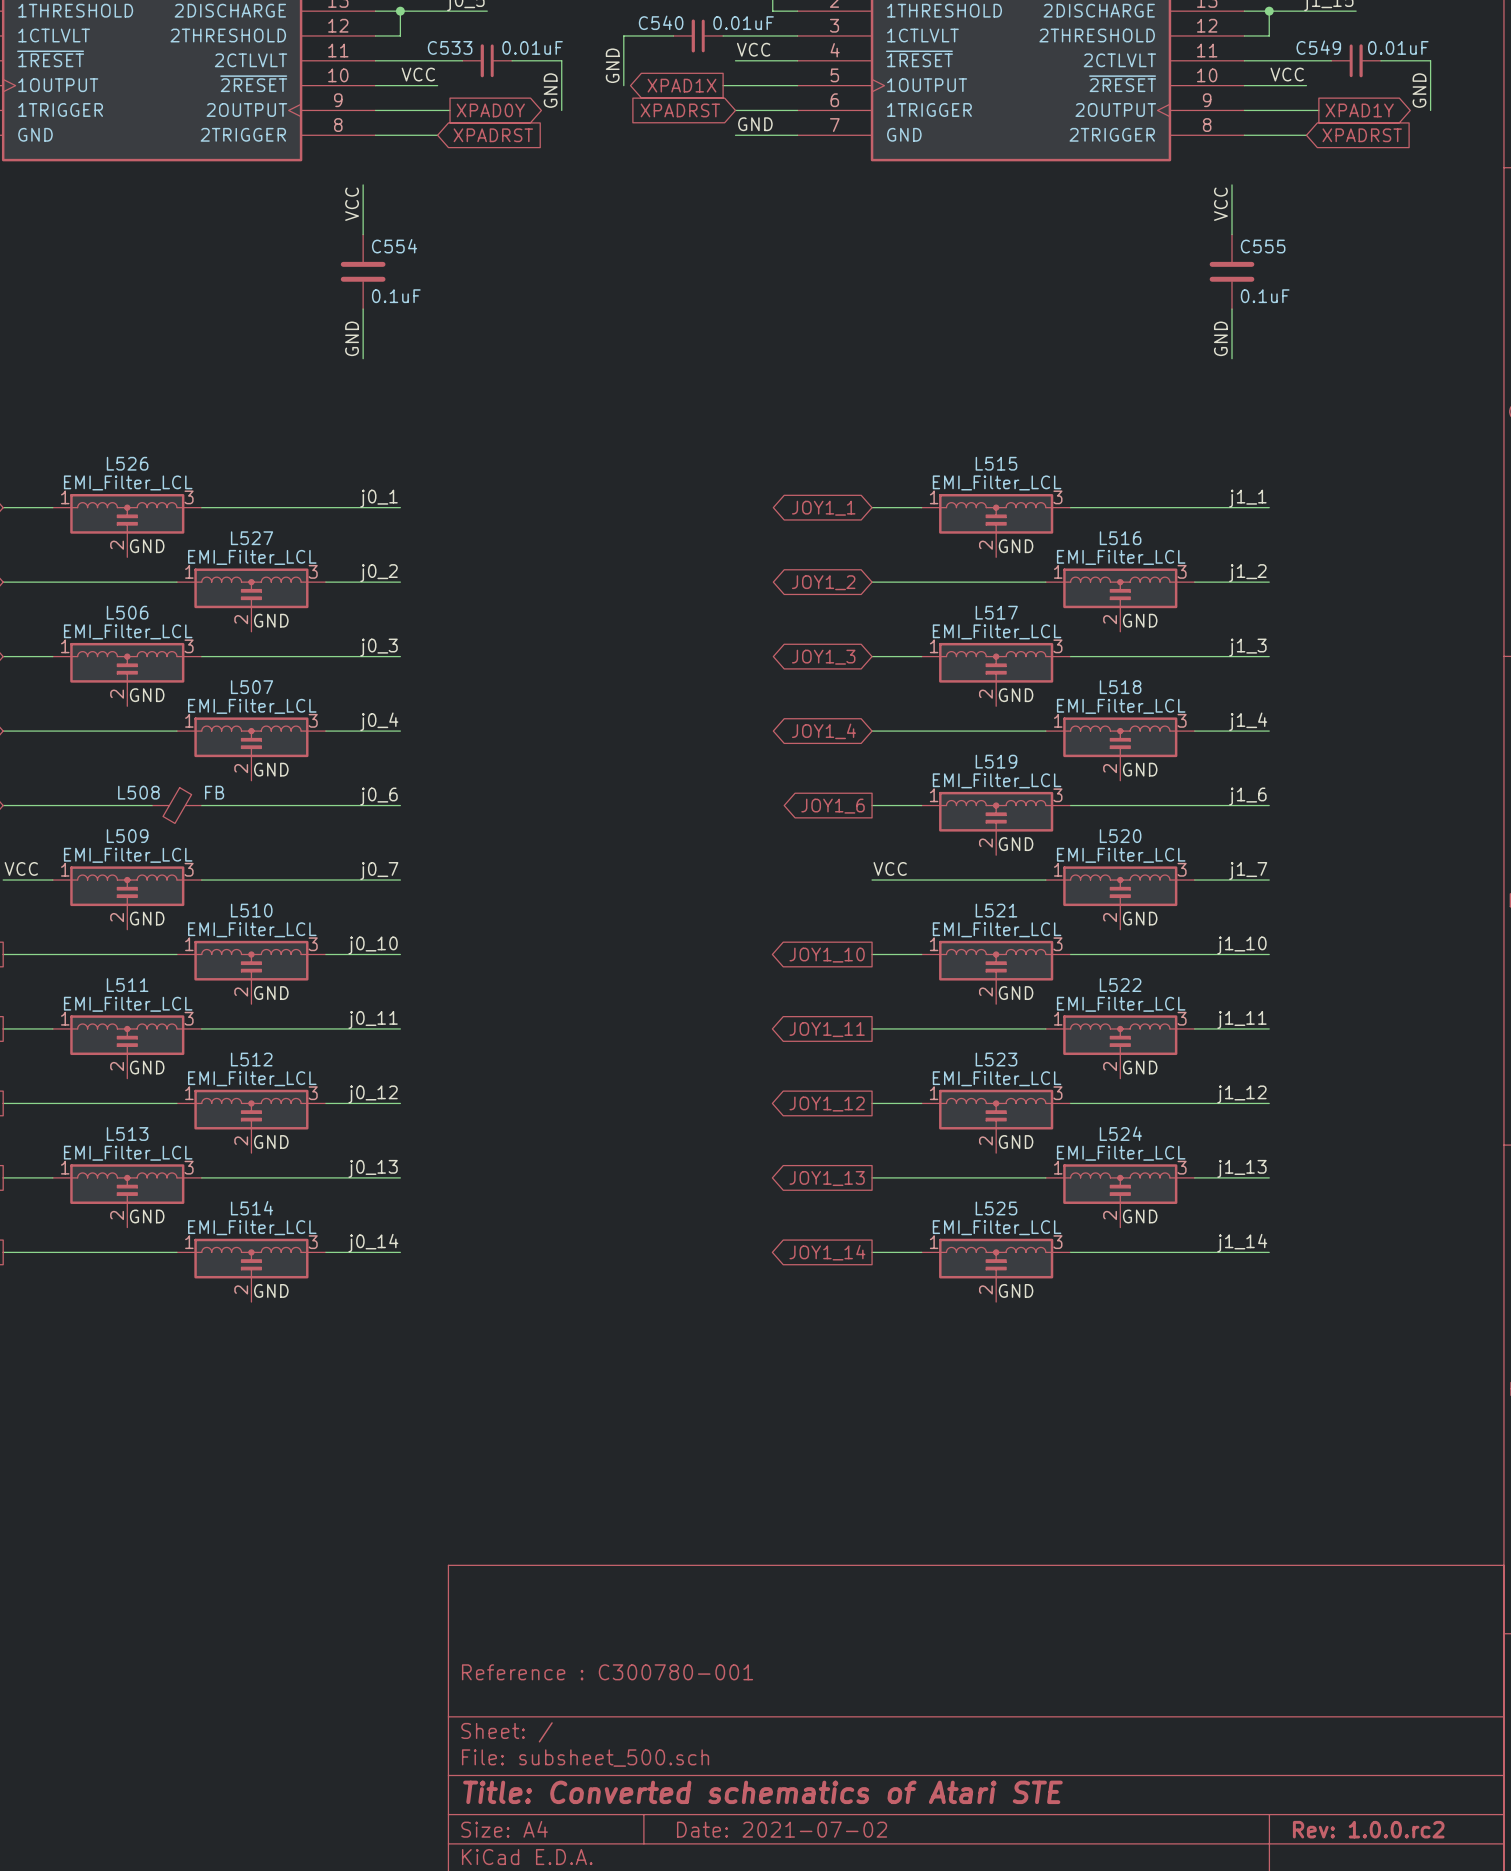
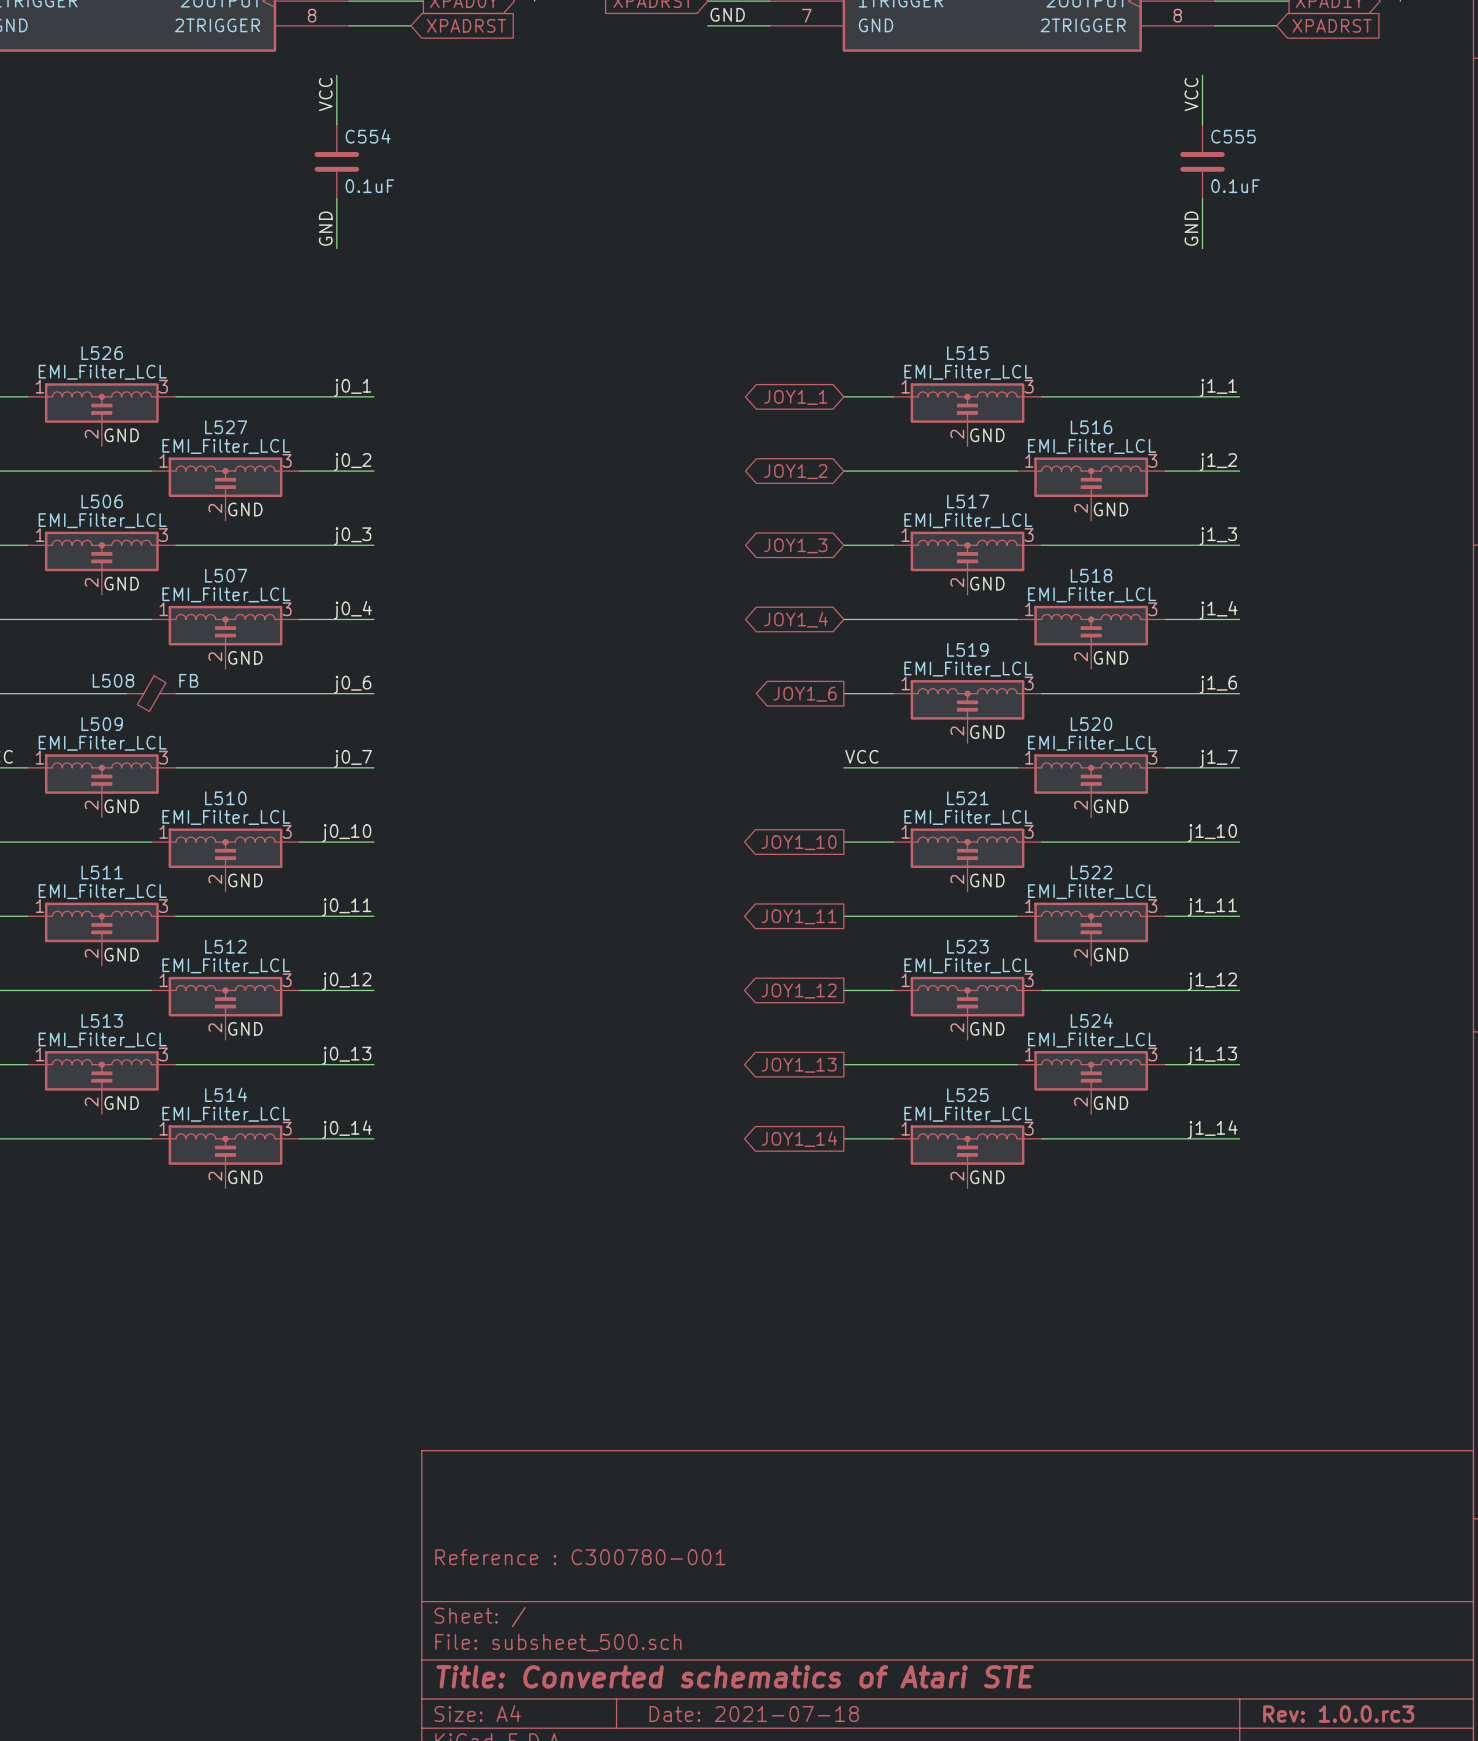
title block: Date: 2021-07-02 (782, 1829) -> Date: 2021-07-18 (754, 1714)
title block: Rev: 1.0.0.rc2 (1368, 1829) -> Rev: 1.0.0.rc3 (1338, 1714)

